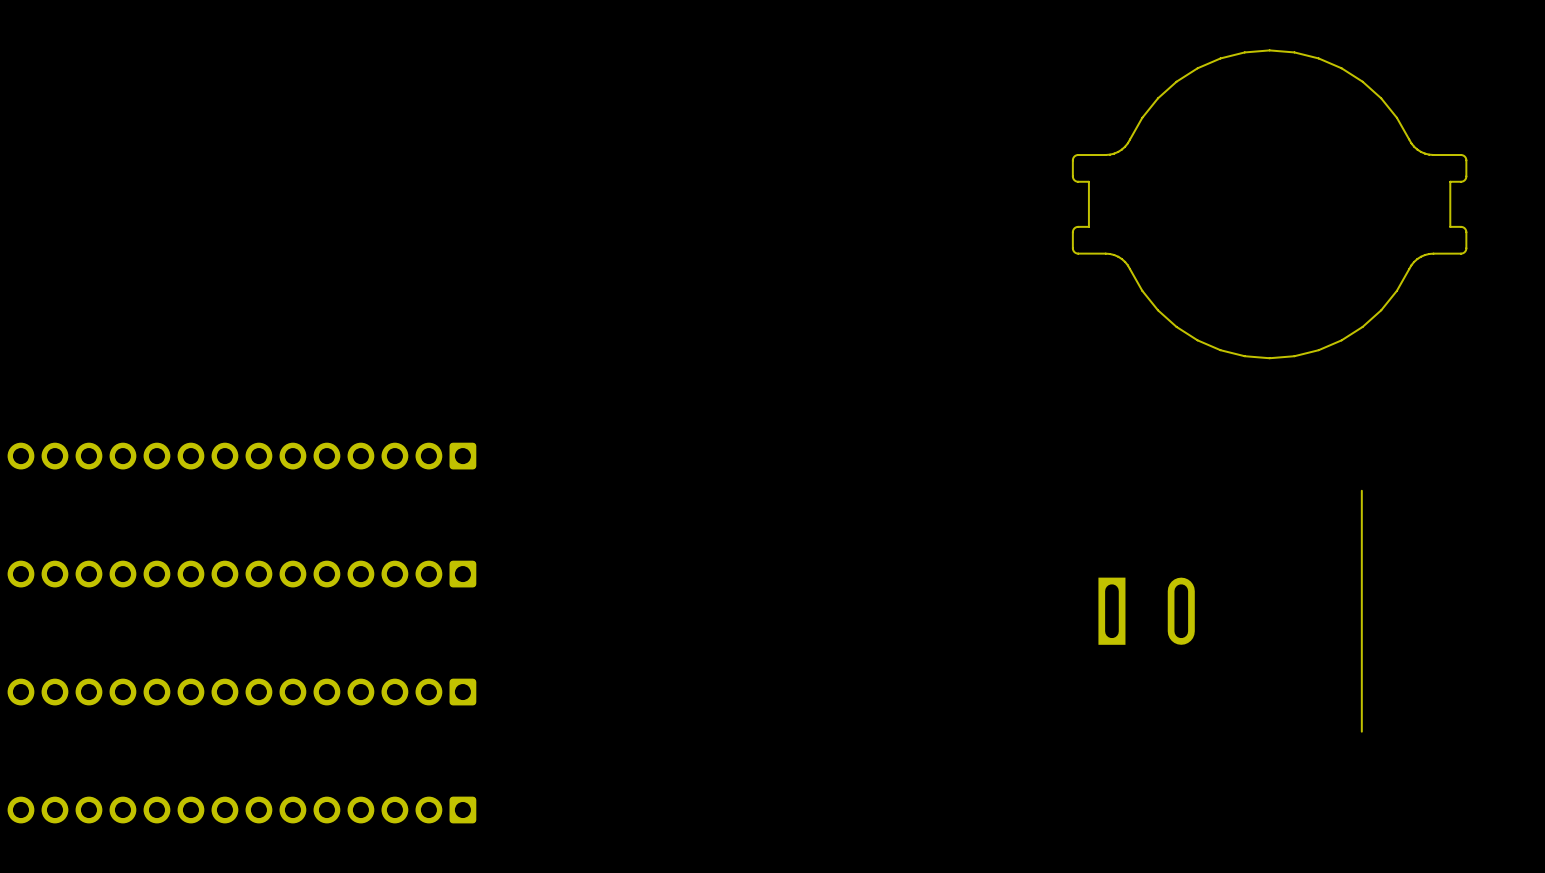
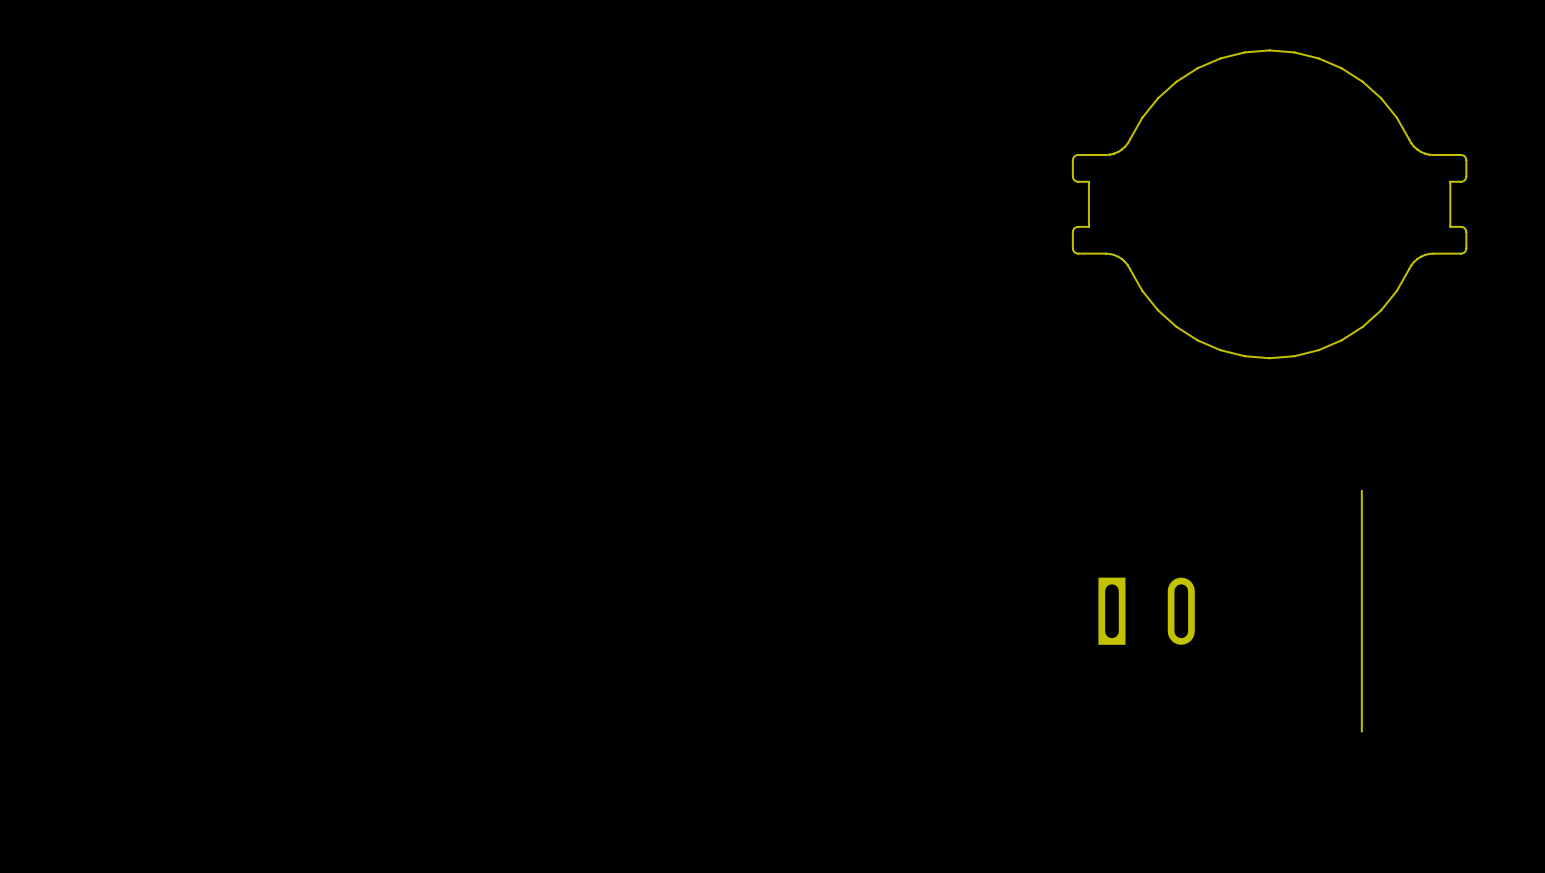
part: (241, 456) -> none
part: (241, 574) -> none
part: (241, 692) -> none
part: (241, 810) -> none

